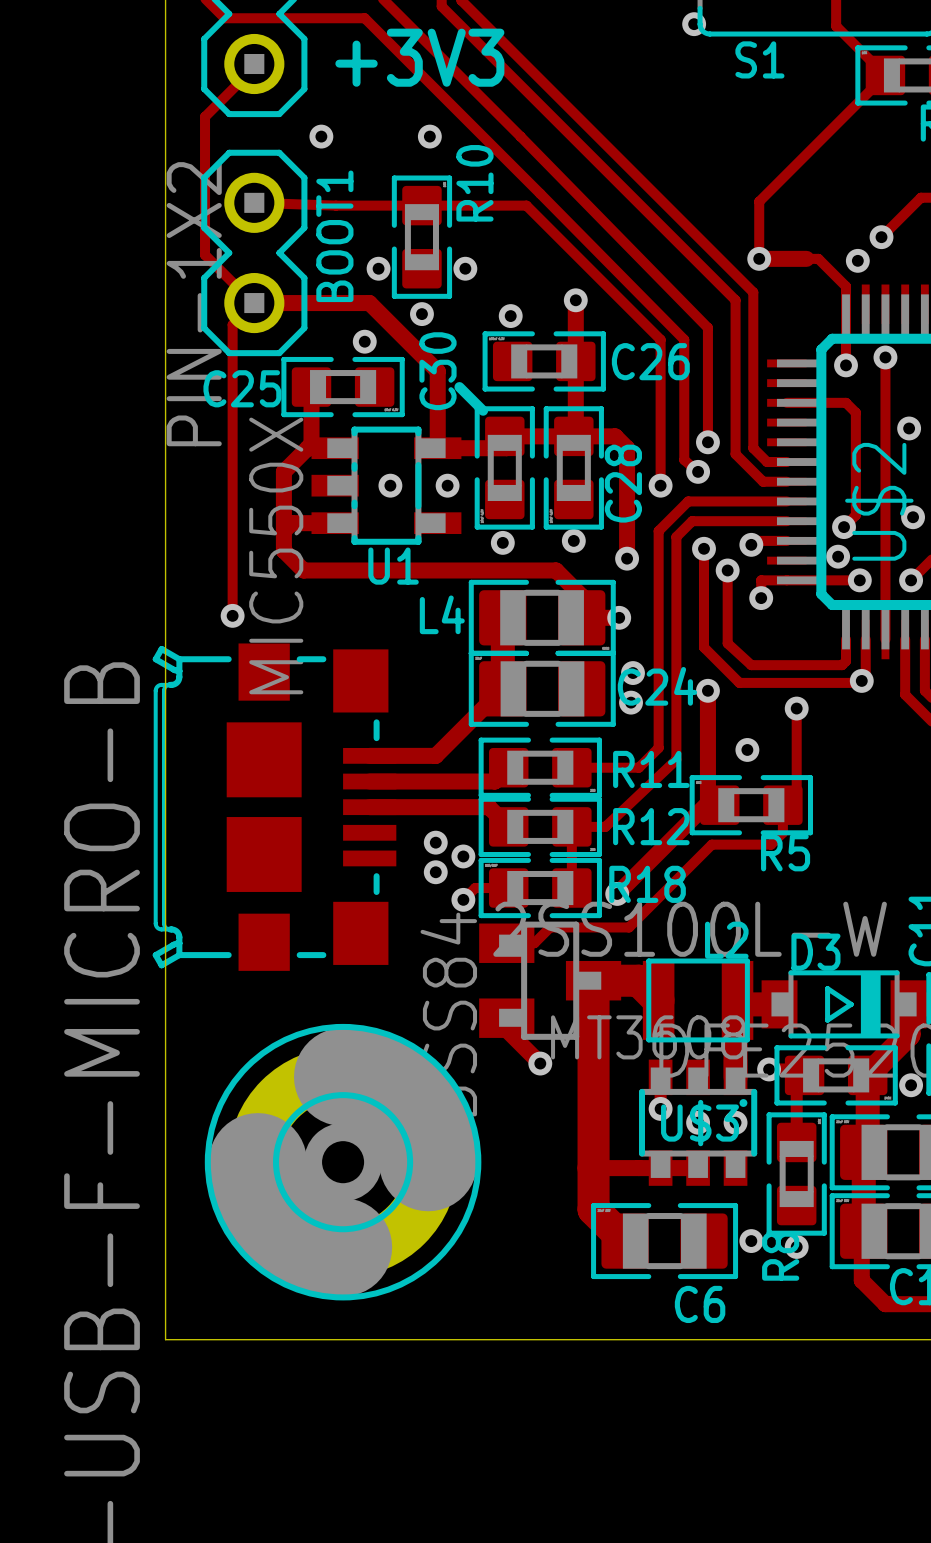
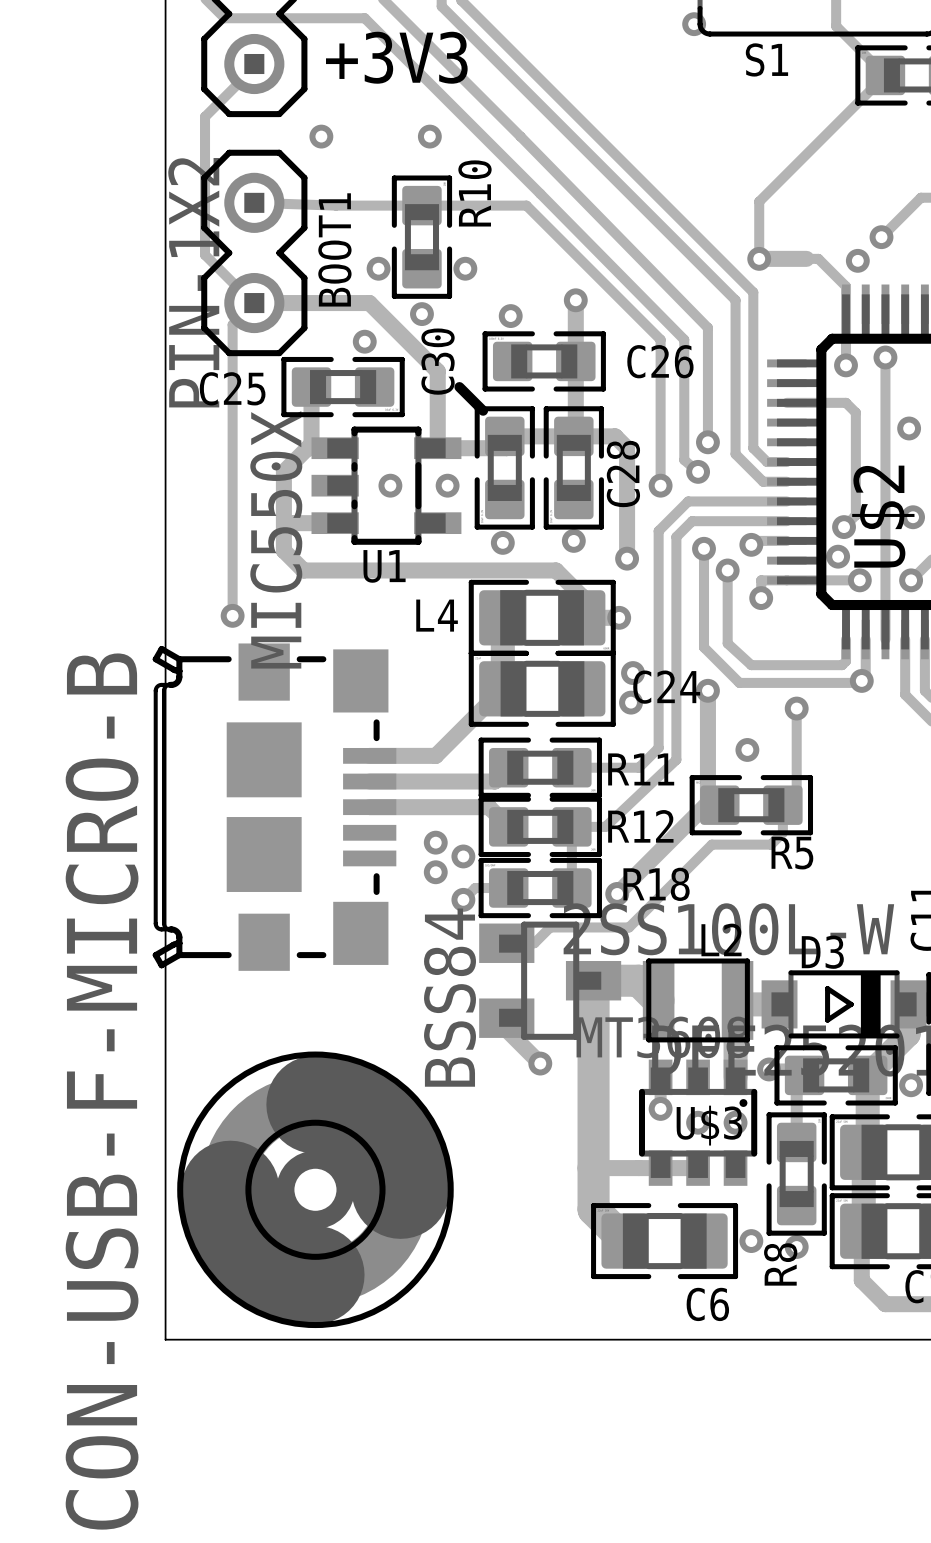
part position: (343, 1162) -> (315, 1189)

